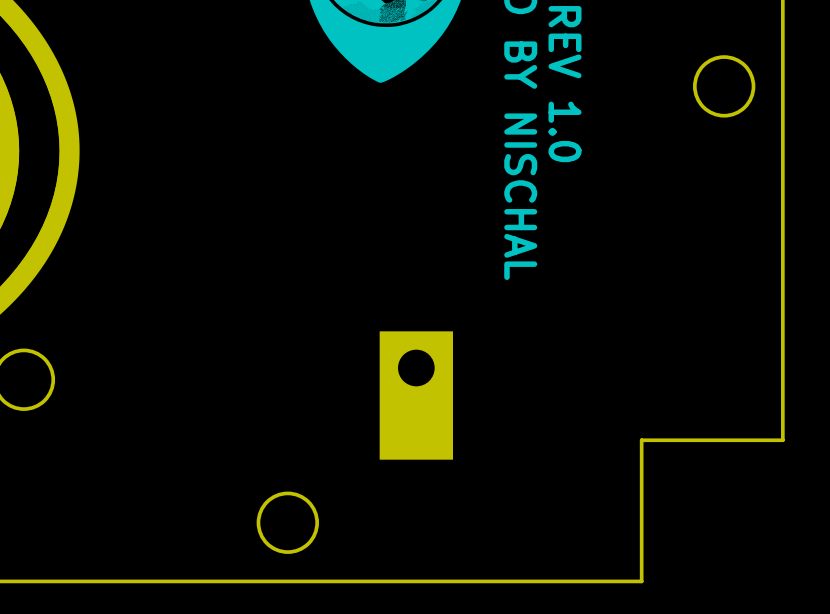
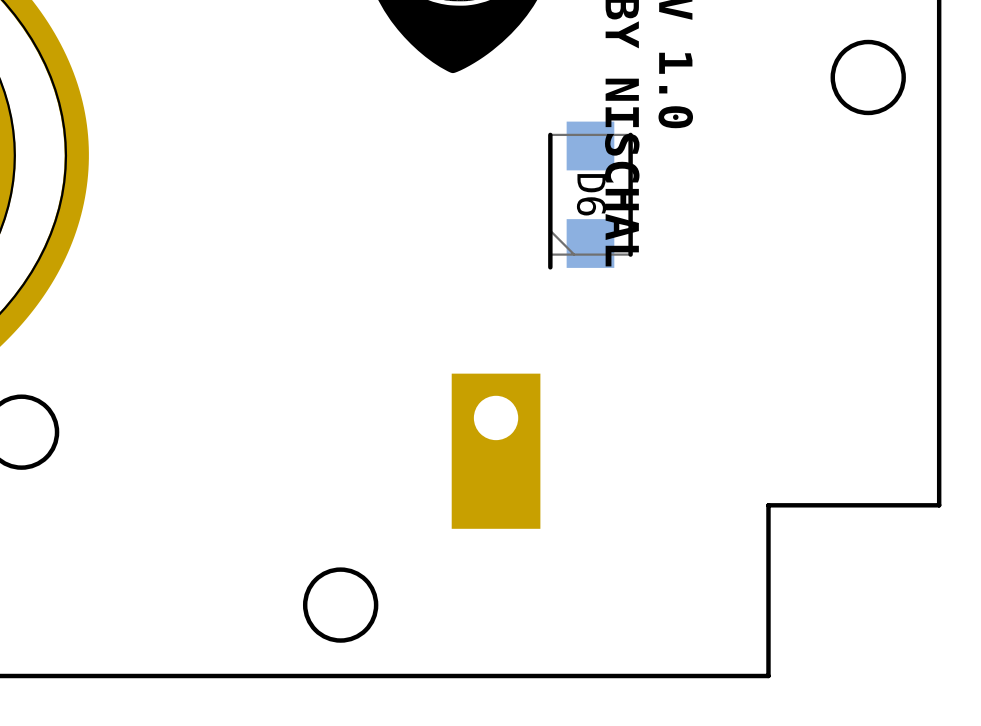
D6: none -> (590, 195)

